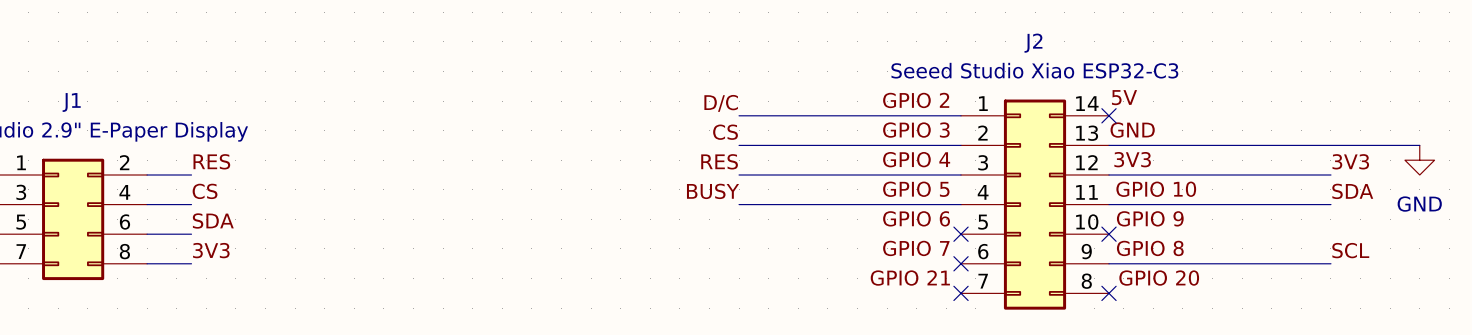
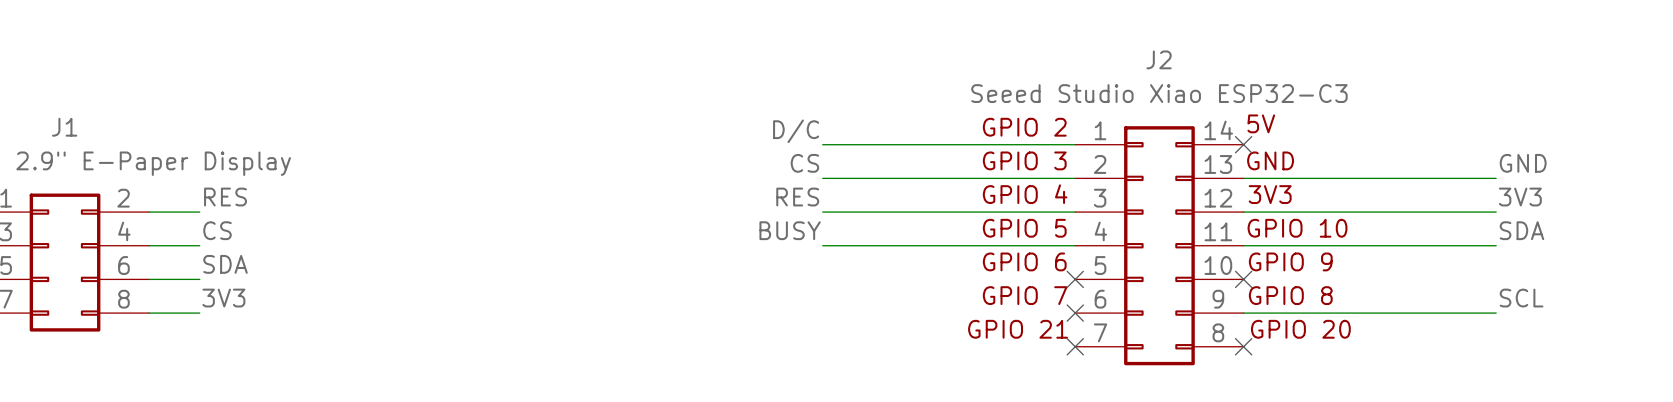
label: none -> GND (1523, 163)
wire: (1330, 145) (1419, 145) -> none
power symbol: GND (1419, 160) -> none

